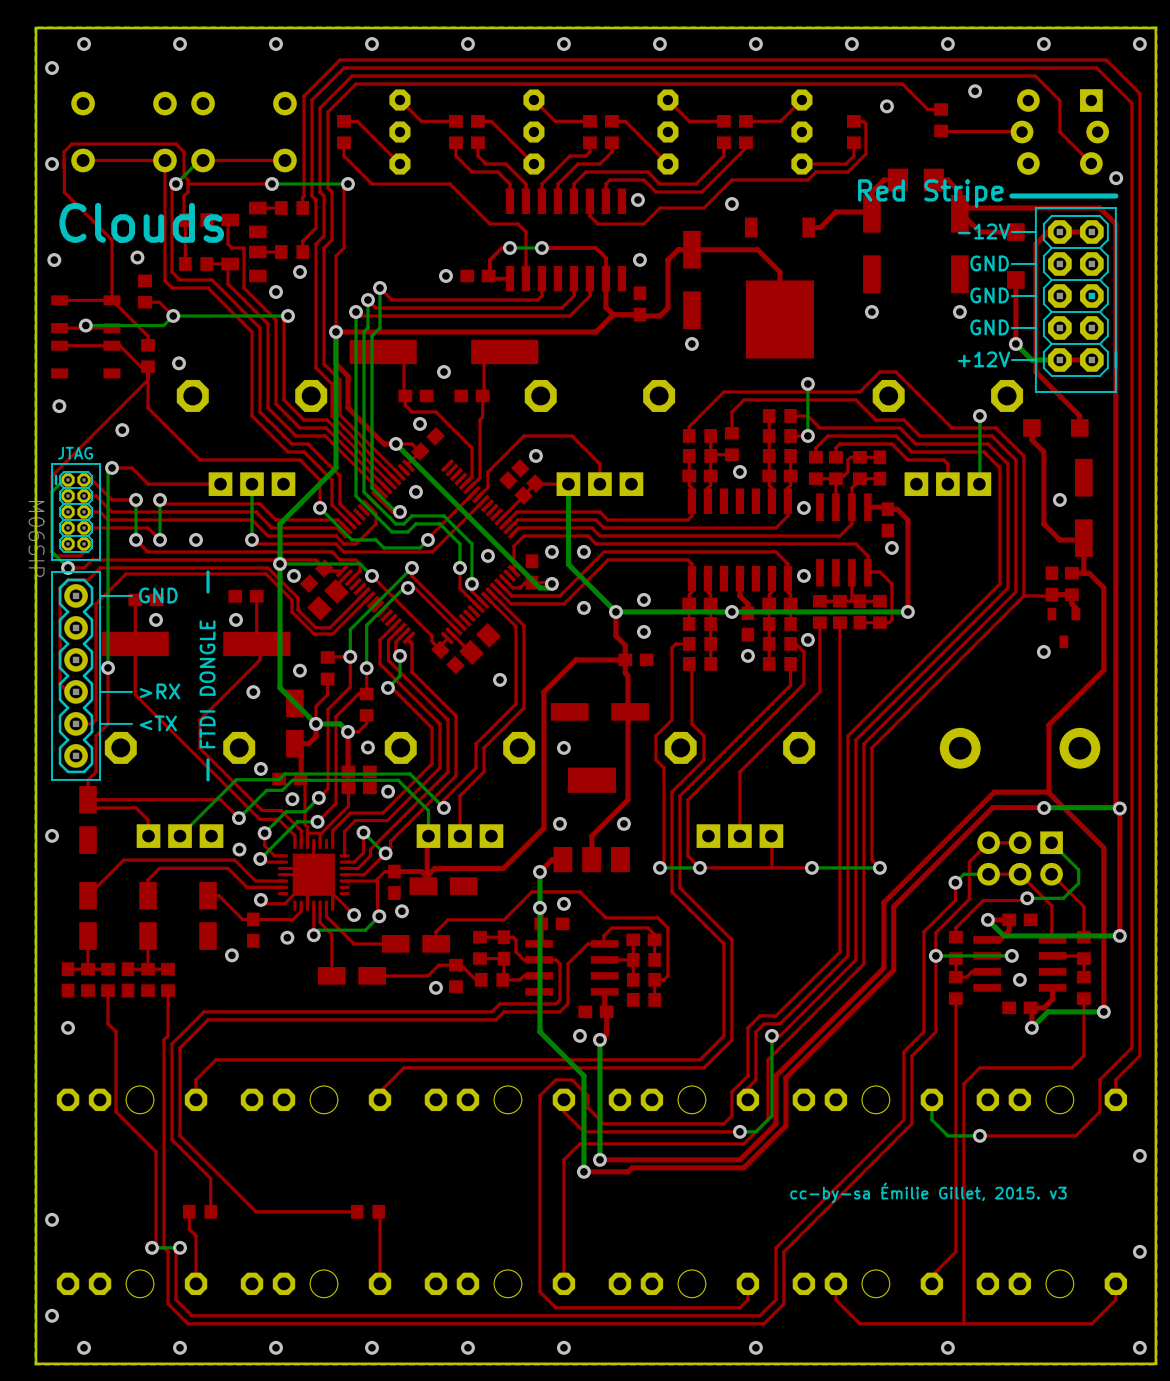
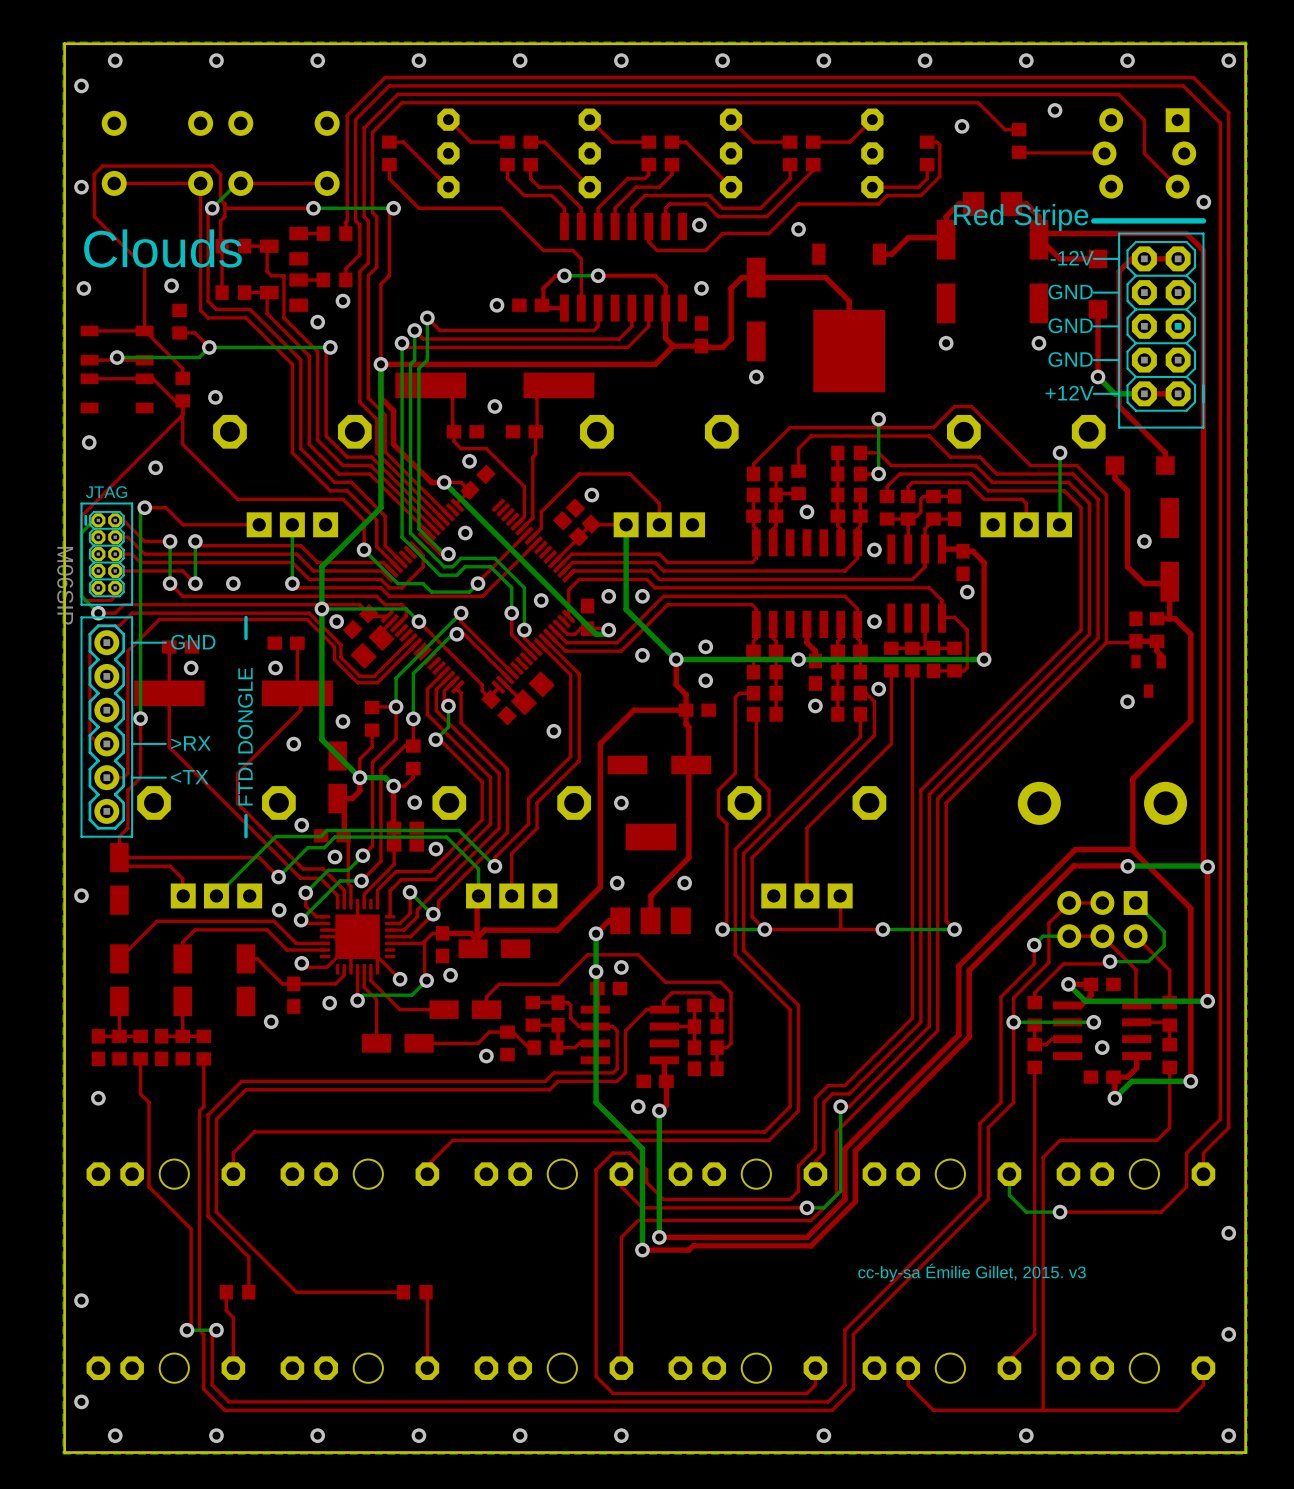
top track: (307, 833) (320, 834) -> none

